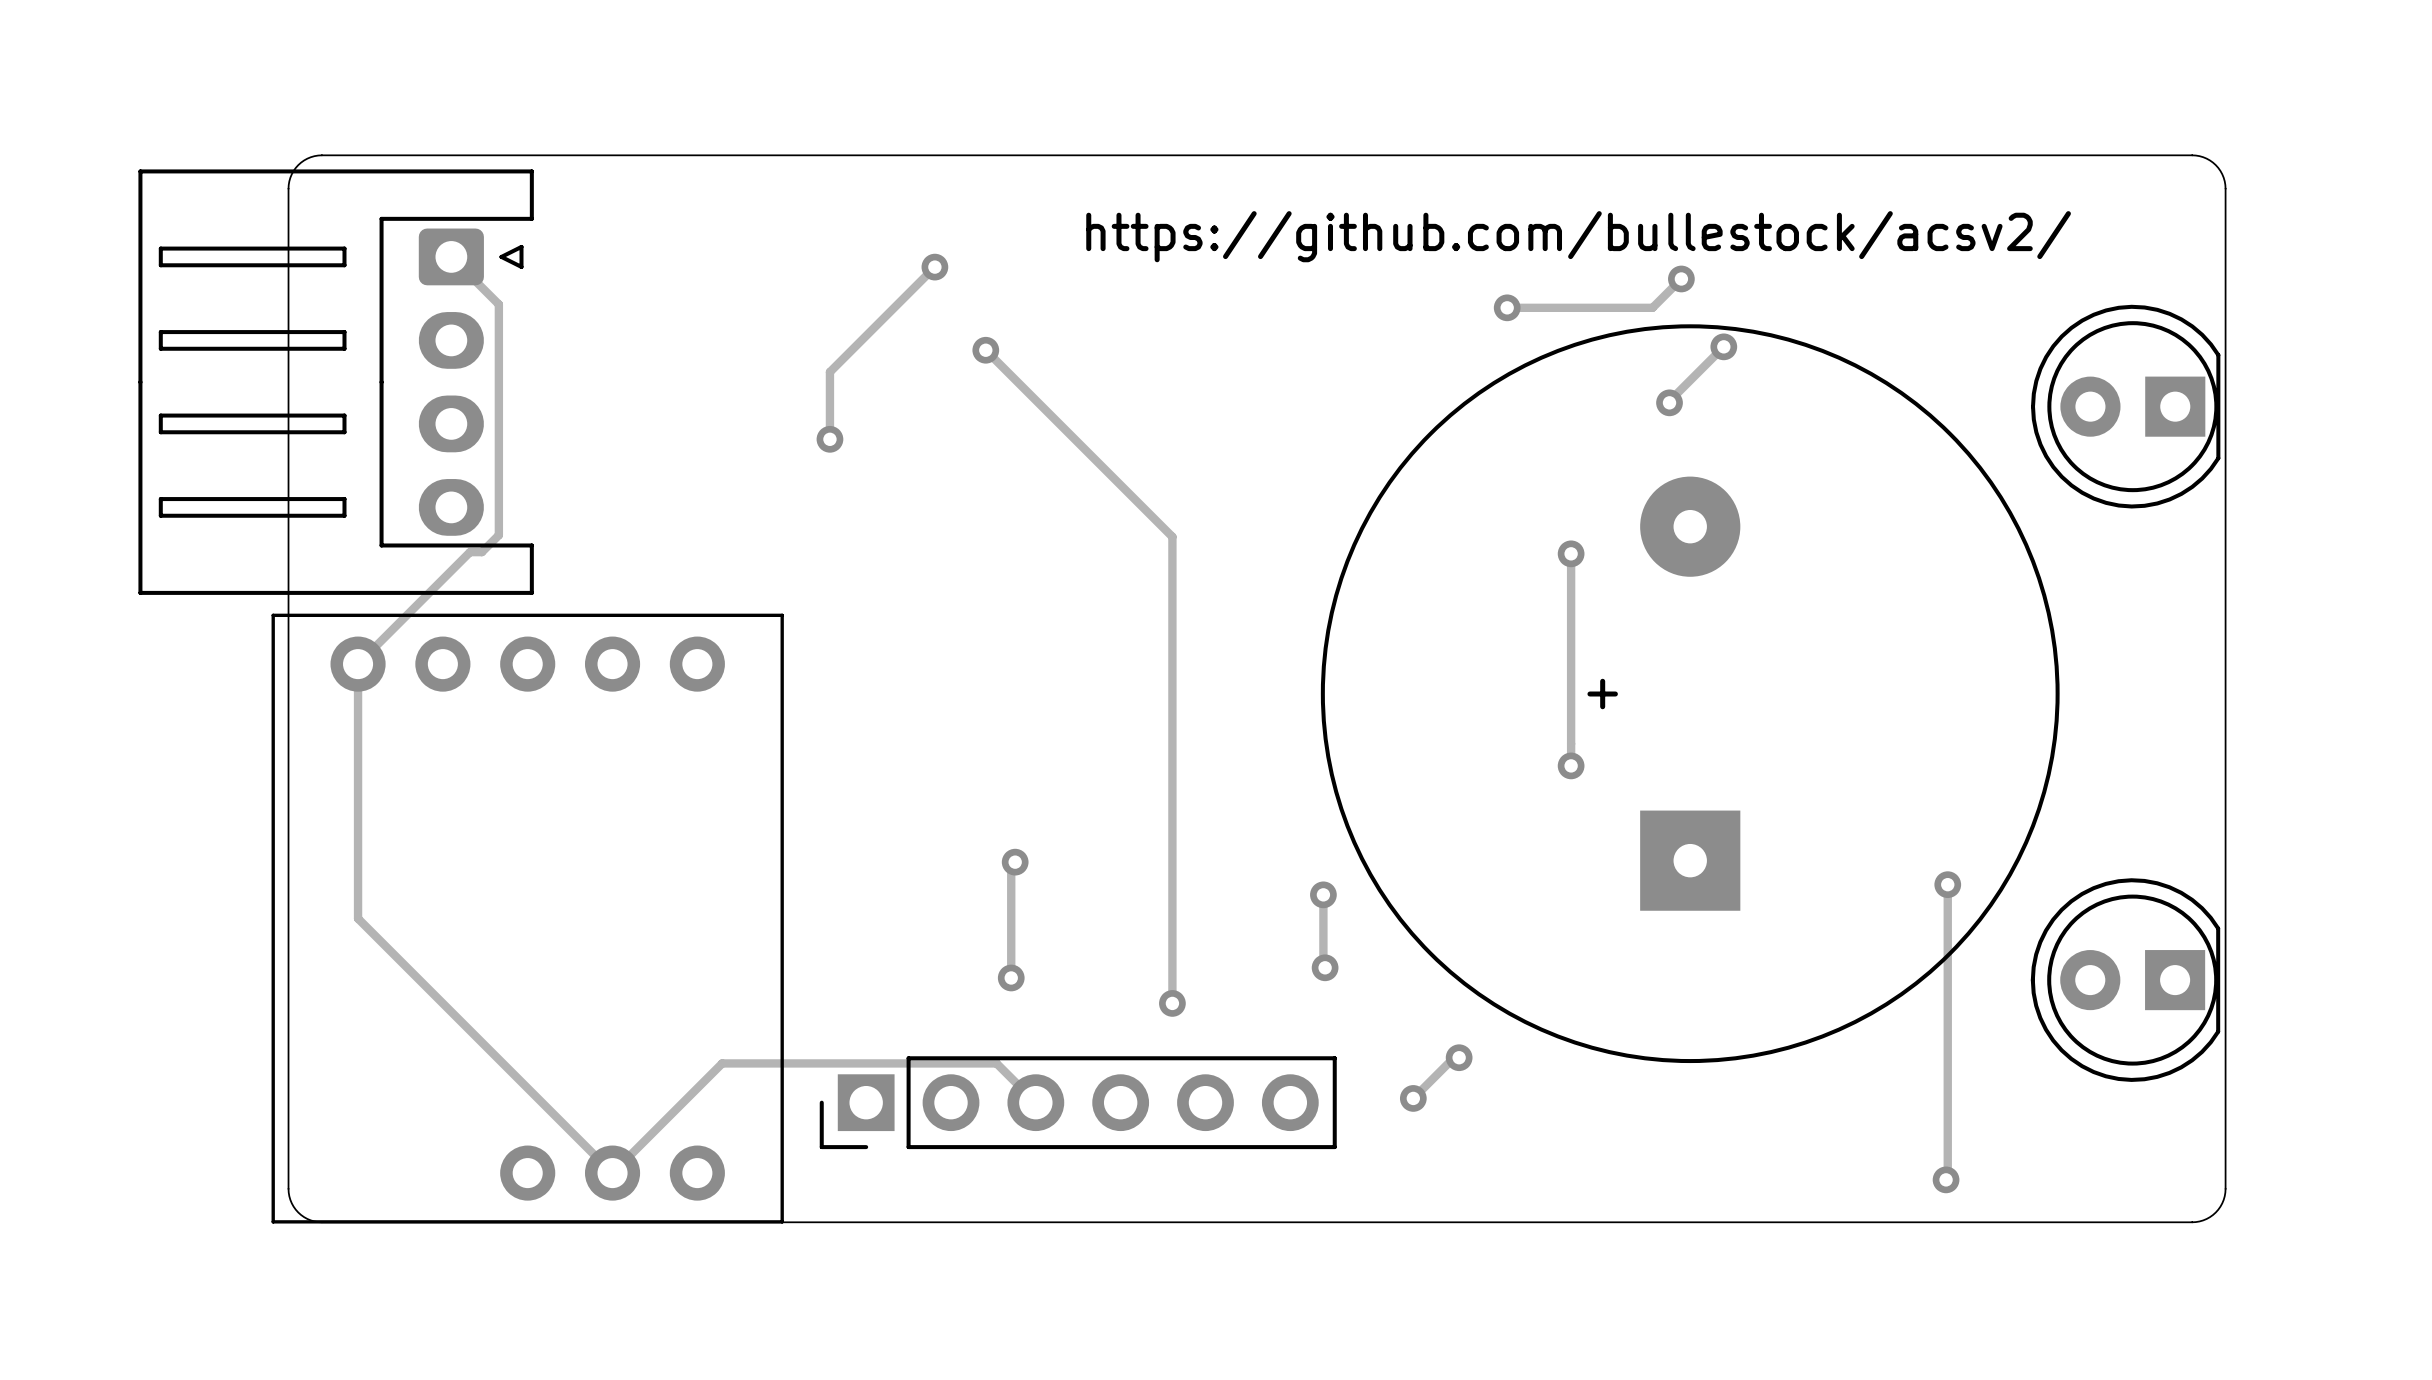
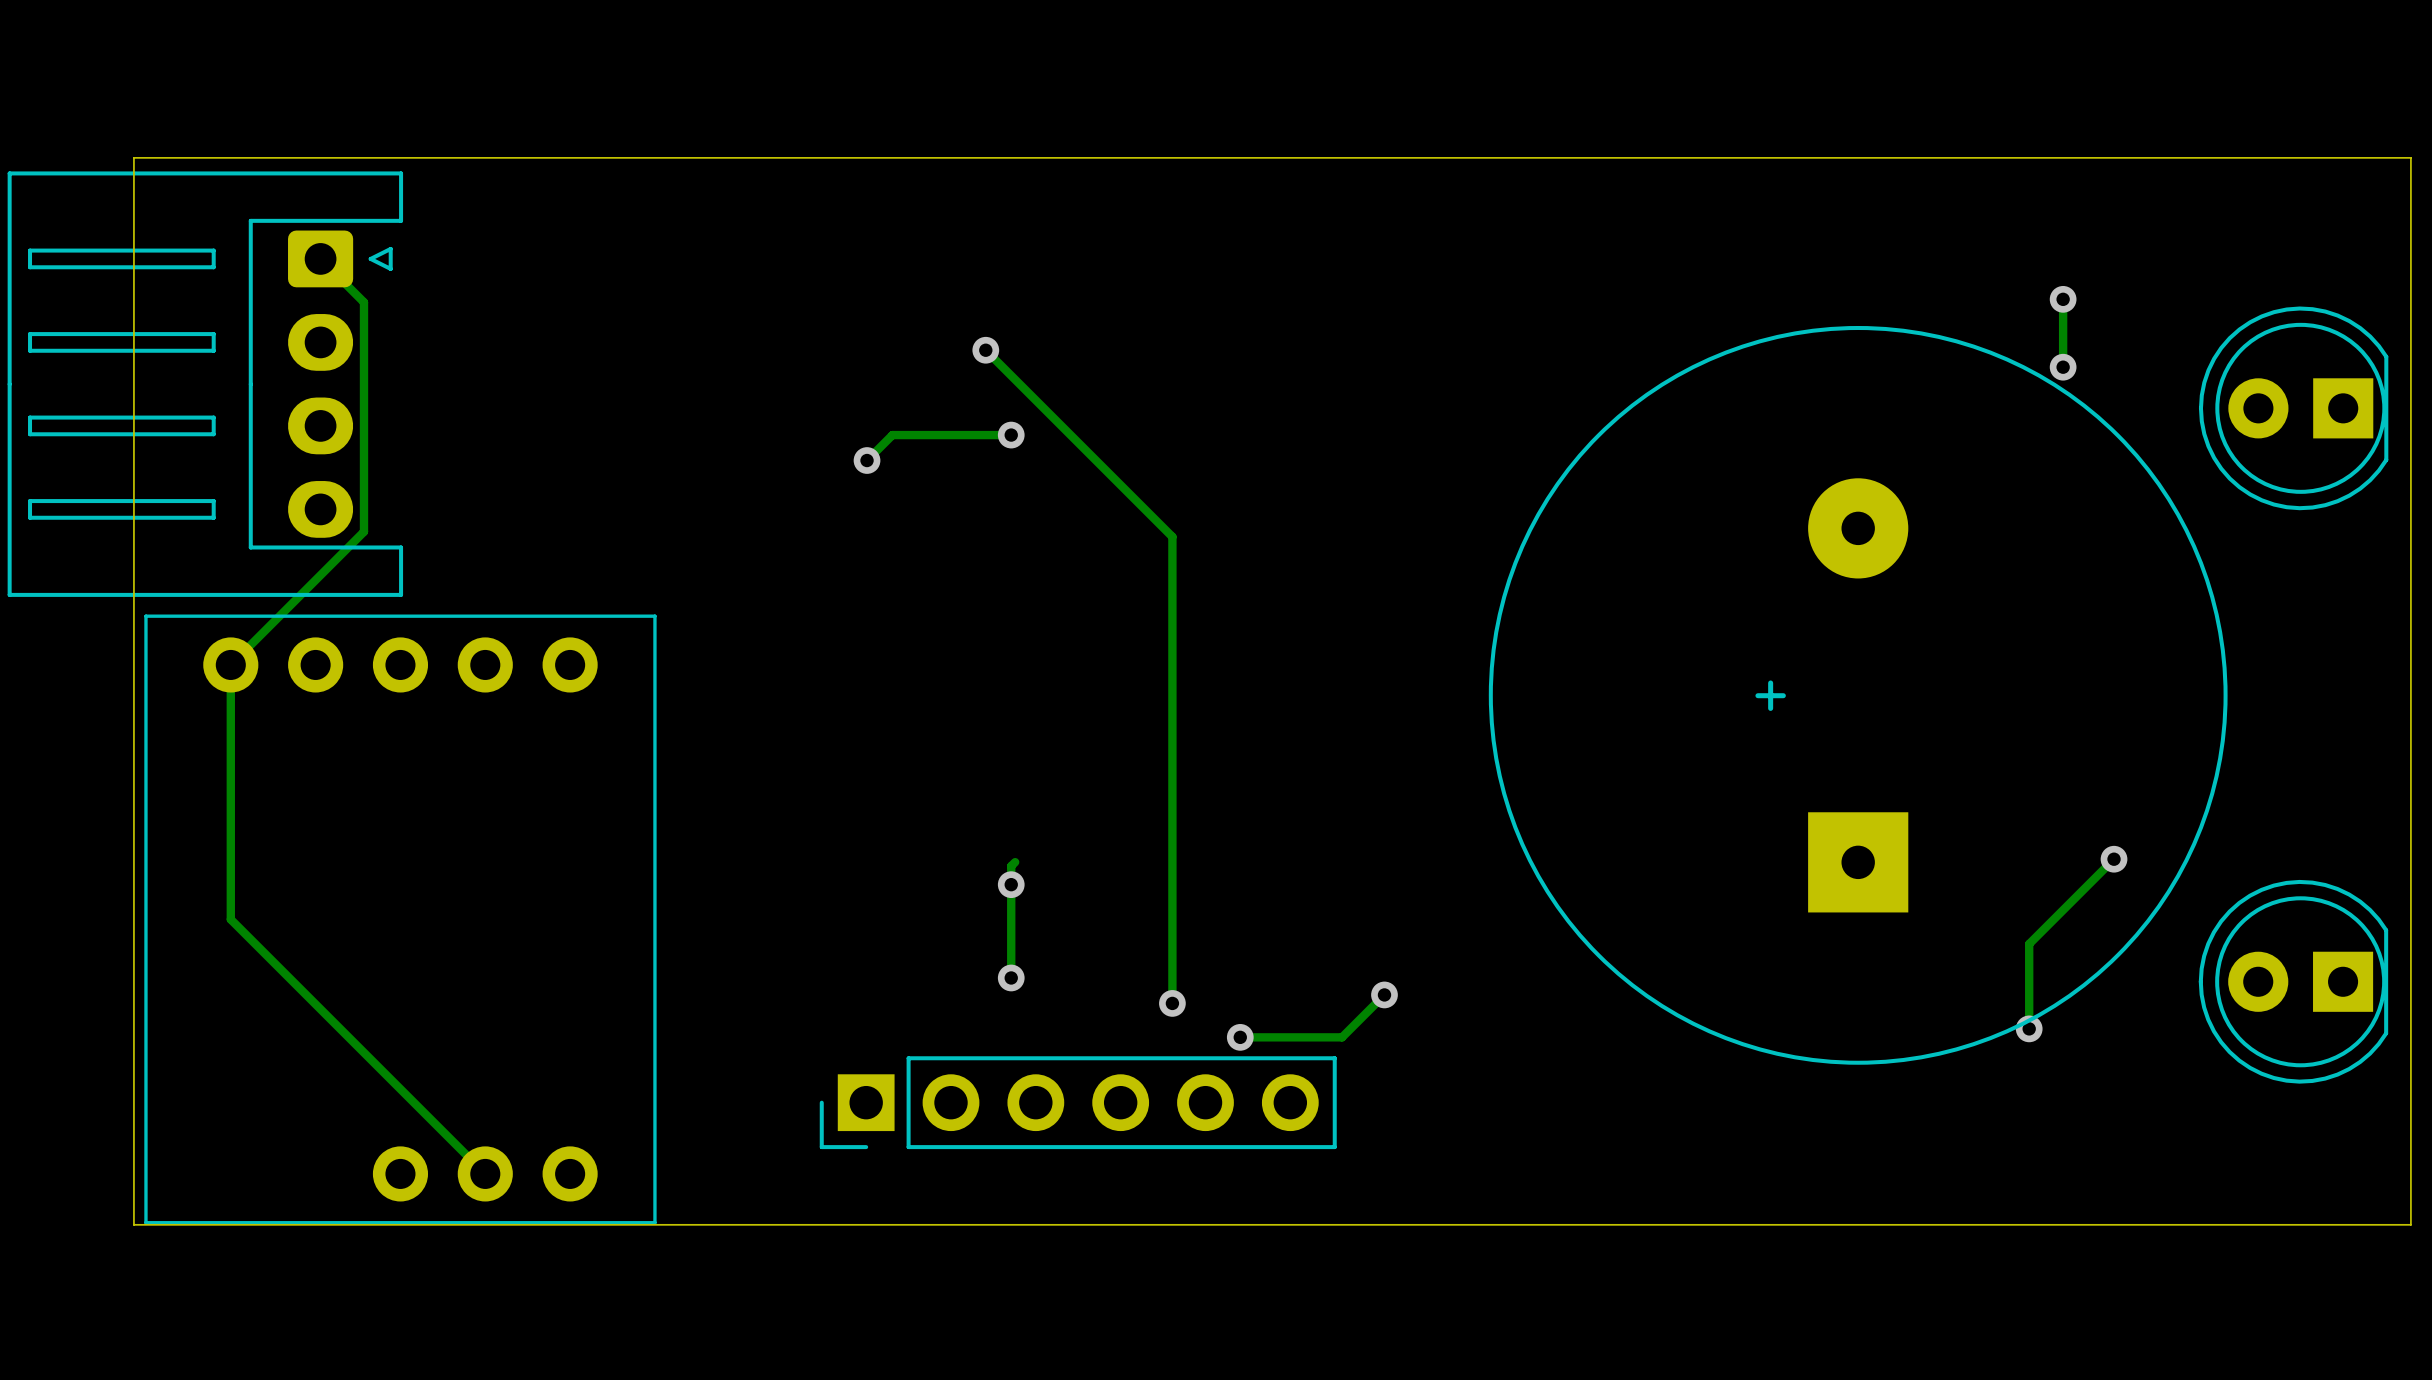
board edge: (2192, 155) (321, 155) (307, 158) (293, 170) (288, 188) (288, 1188) (291, 1203) (304, 1217) (321, 1222) (2192, 1222) (2206, 1218) (2220, 1206) (2225, 1188) (2225, 188) (2223, 177) (2215, 165) (2206, 158) (2192, 155) -> (2410, 157) (2410, 1224) (133, 1224) (133, 157) (2410, 157)
text: https://github.com/bullestock/acsv2/ (1578, 236) -> none
track: (451, 256) (498, 304) (498, 535) (481, 552) (470, 552) (358, 664) (358, 918) (612, 1173) (722, 1063) (996, 1063) (1035, 1102) -> none
track: none -> (320, 258) (363, 302) (363, 531) (230, 664) (230, 919) (485, 1173)
track: (934, 267) (829, 372) (829, 439) -> none
via: (934, 267) -> none
track: (1681, 278) (1652, 307) (1507, 307) -> none
via: (1681, 278) -> none
track: none -> (2063, 299) (2063, 367)
via: none -> (2063, 299)
via: (1507, 307) -> none
track: (1723, 346) (1669, 402) -> none
via: (1723, 346) -> none
via: none -> (2063, 367)
part position: (336, 382) -> (205, 384)
via: (1669, 402) -> none
part: (2125, 406) -> none
part: none -> (2293, 408)
track: none -> (1011, 435) (892, 435) (867, 460)
via: none -> (1011, 435)
via position: (829, 439) -> (867, 460)
track: (1571, 553) (1571, 765) -> none
via: (1571, 553) -> none
part position: (1690, 693) -> (1858, 695)
via: (1571, 765) -> none
track: none -> (2114, 859) (2029, 944) (2029, 1028)
via: none -> (2114, 859)
via position: (1015, 862) -> (1011, 884)
track: (1947, 884) (1947, 1178) (1946, 1179) -> none
via: (1947, 884) -> none
track: (1323, 894) (1323, 966) (1325, 967) -> none
via: (1323, 894) -> none
part position: (527, 918) -> (400, 919)
via: (1325, 967) -> none
part: (2125, 980) -> none
part: none -> (2293, 981)
track: none -> (1384, 994) (1342, 1037) (1240, 1037)
via: none -> (1384, 994)
via: none -> (2029, 1028)
via: none -> (1240, 1037)
track: (1459, 1057) (1454, 1057) (1413, 1098) -> none
via: (1459, 1057) -> none
via: (1413, 1098) -> none
via: (1946, 1179) -> none

